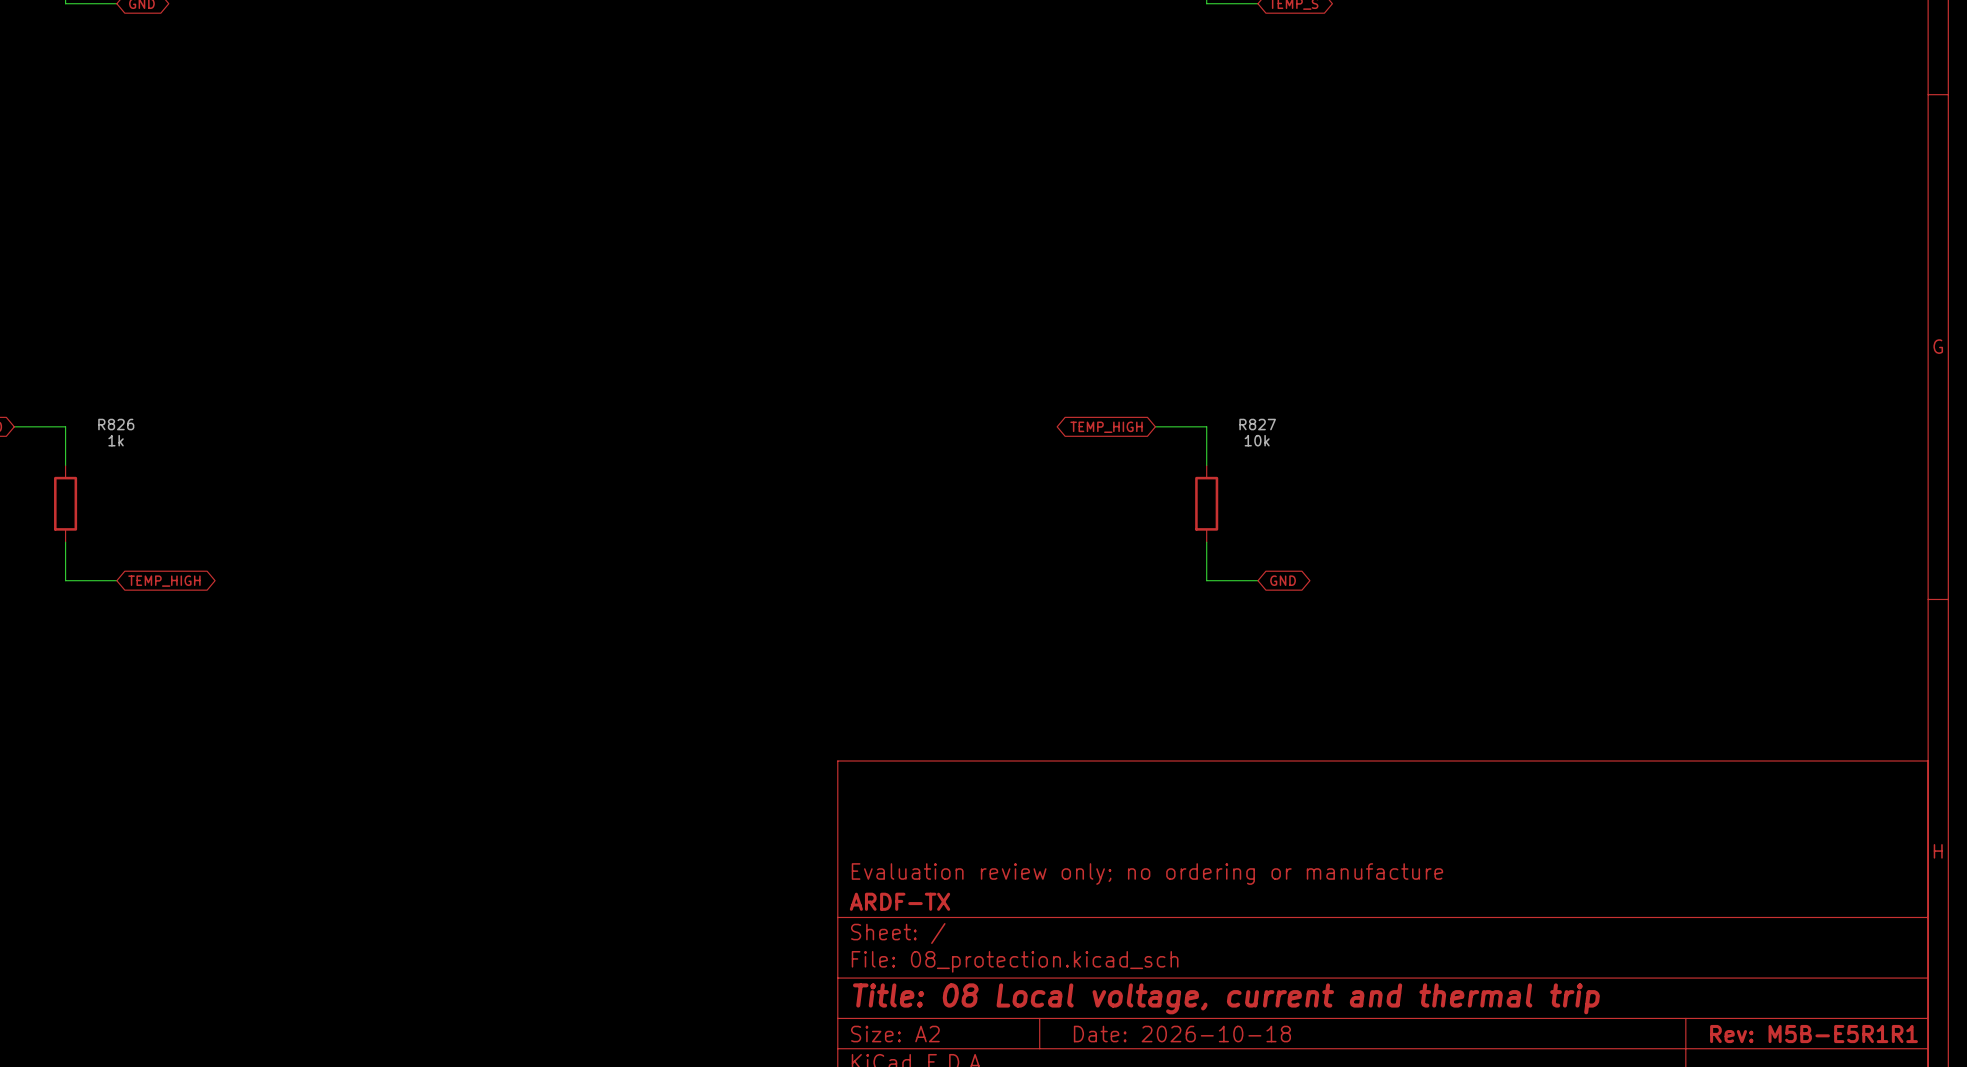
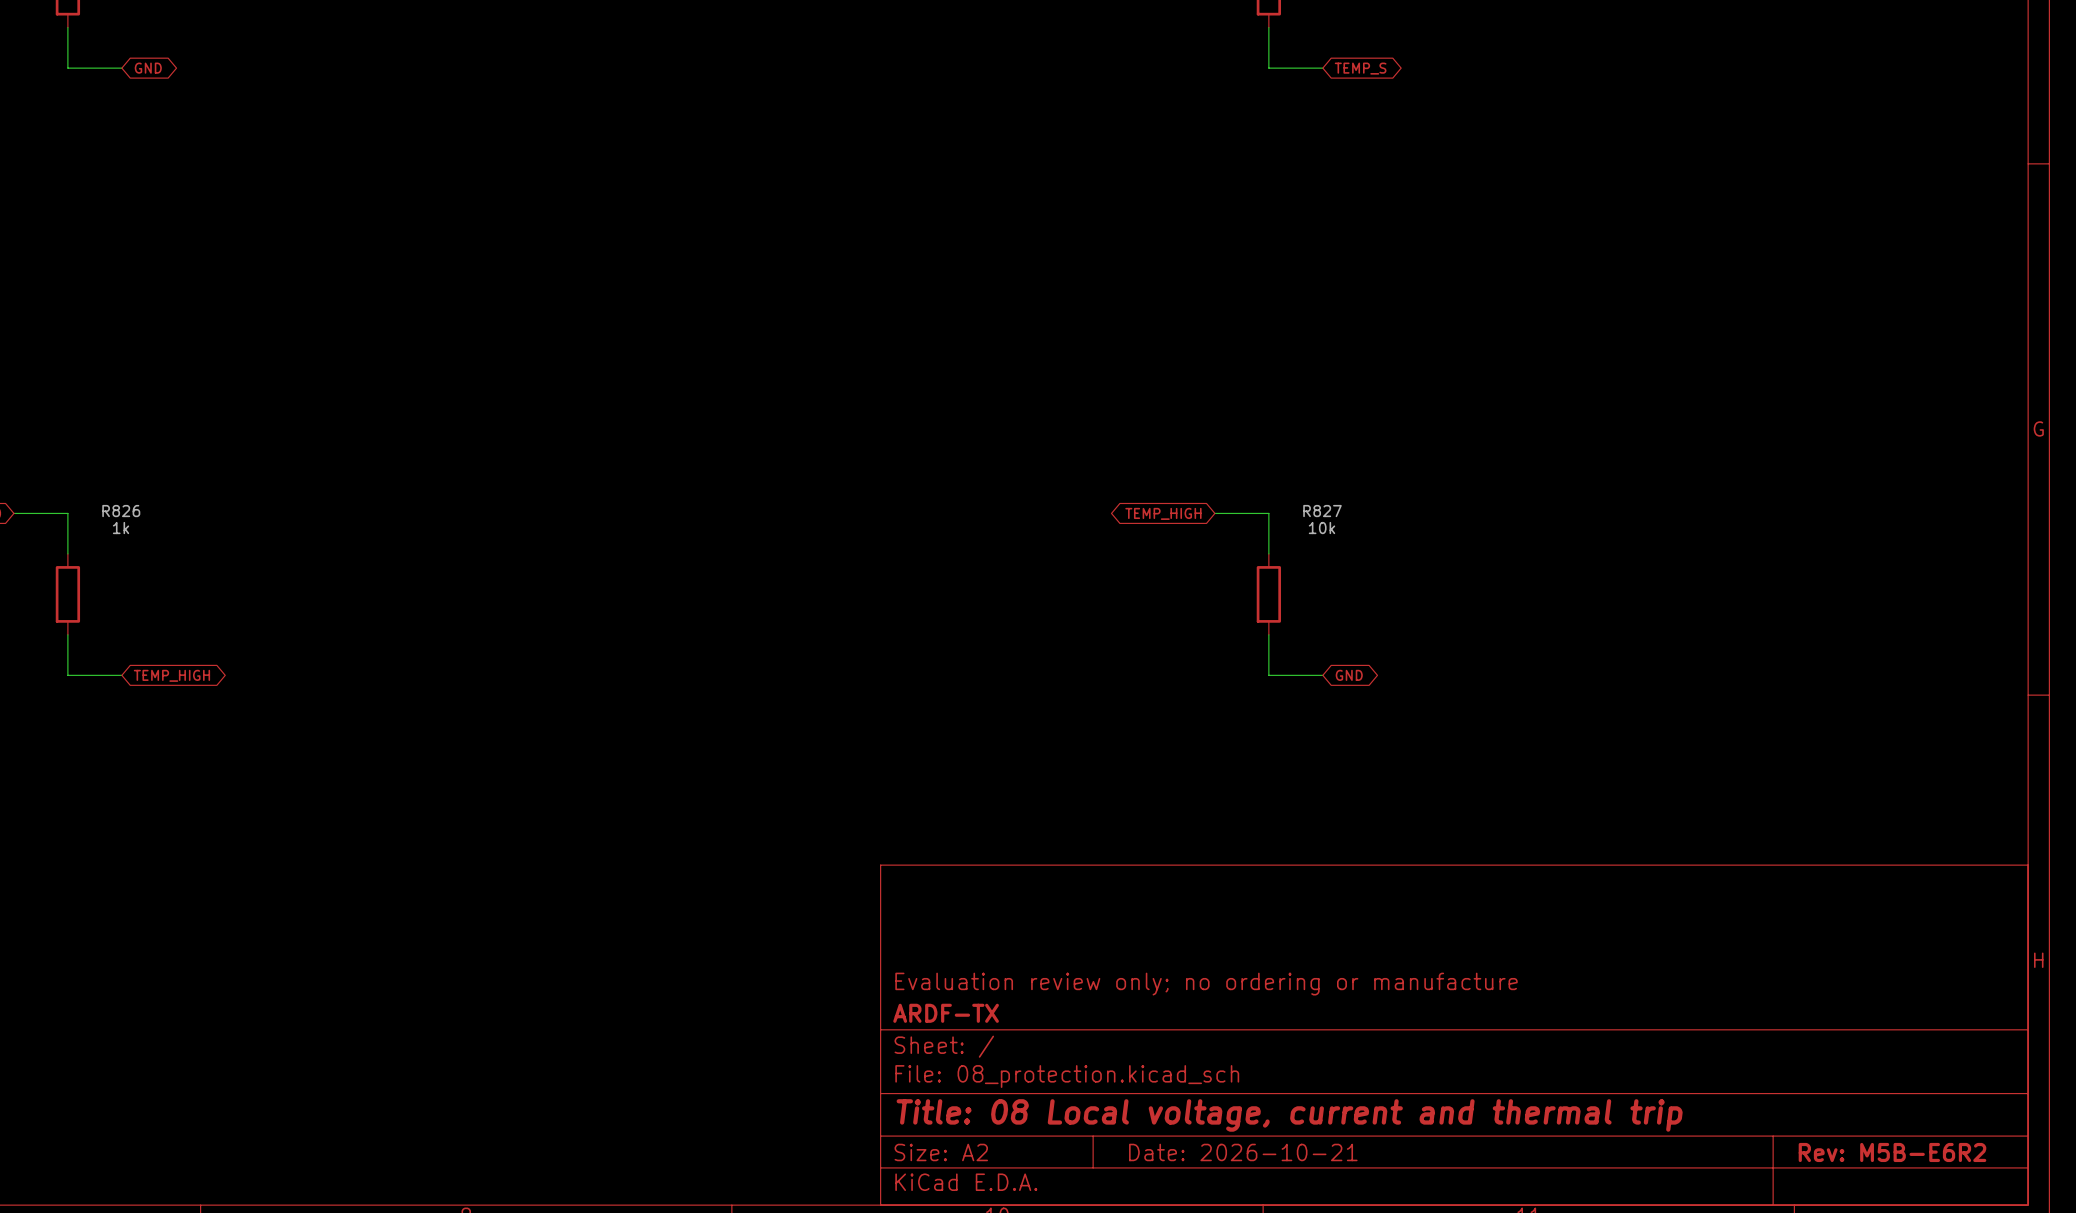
title block: Date: 2026-10-18 (1182, 1034) -> Date: 2026-10-21 (1243, 1152)
title block: Rev: M5B-E5R1R1 (1814, 1034) -> Rev: M5B-E6R2 (1892, 1152)

